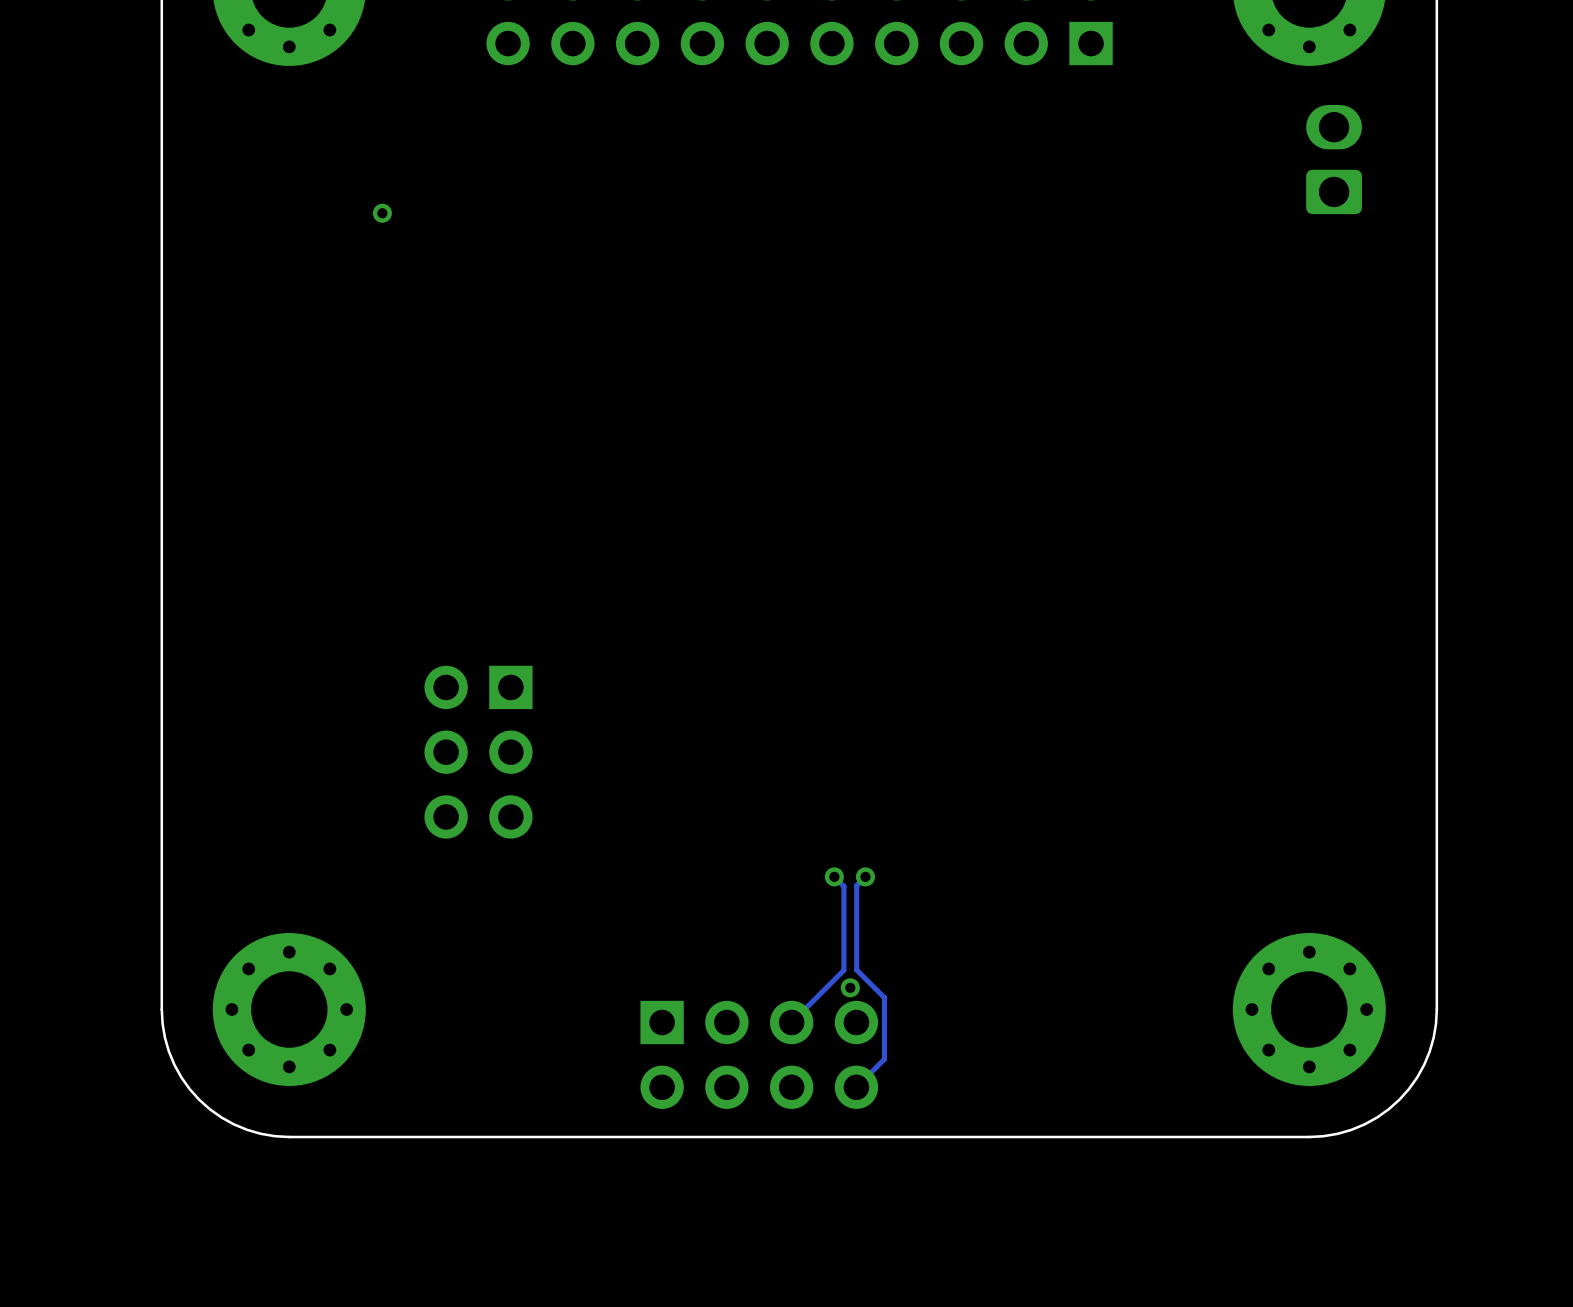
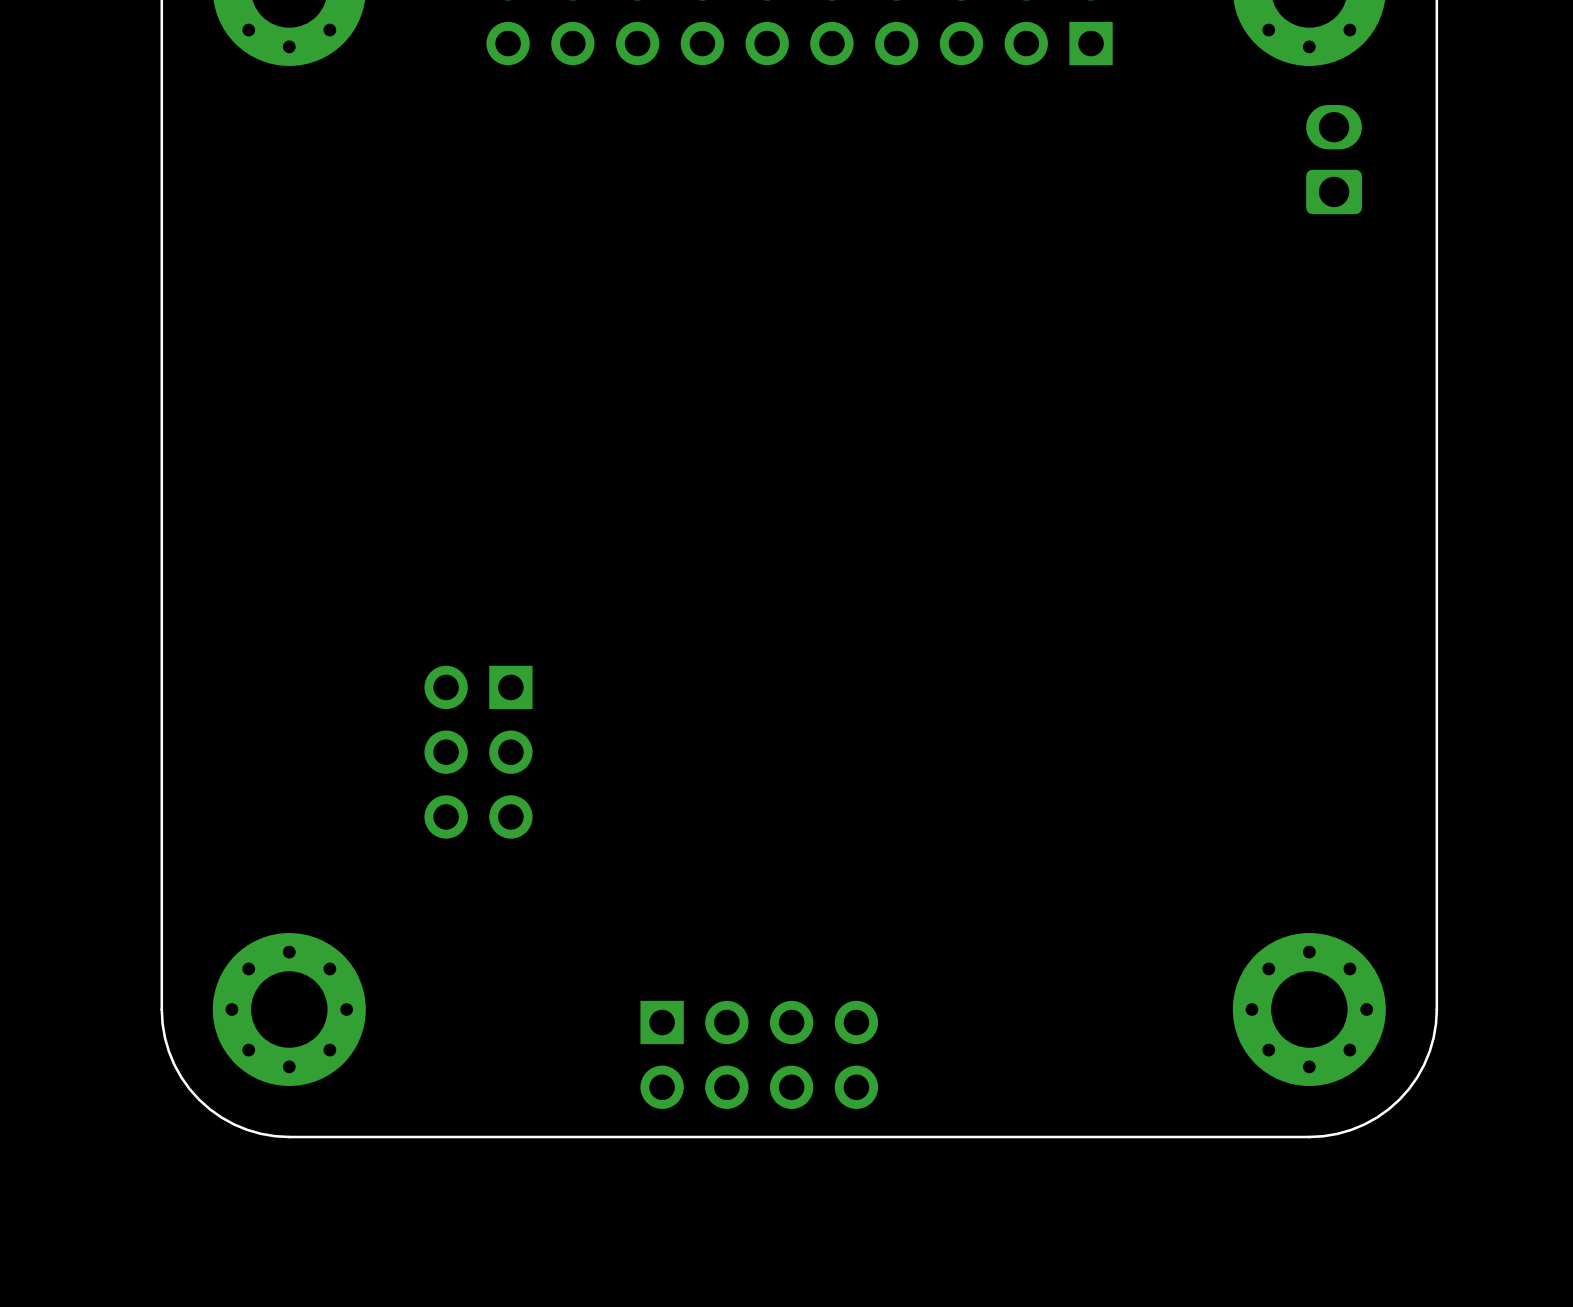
via: (382, 213) -> none
track: (834, 876) (843, 886) (843, 970) (791, 1022) -> none
via: (834, 876) -> none
track: (865, 876) (856, 885) (856, 969) (884, 997) (884, 1059) (856, 1087) -> none
via: (865, 876) -> none
via: (850, 987) -> none

